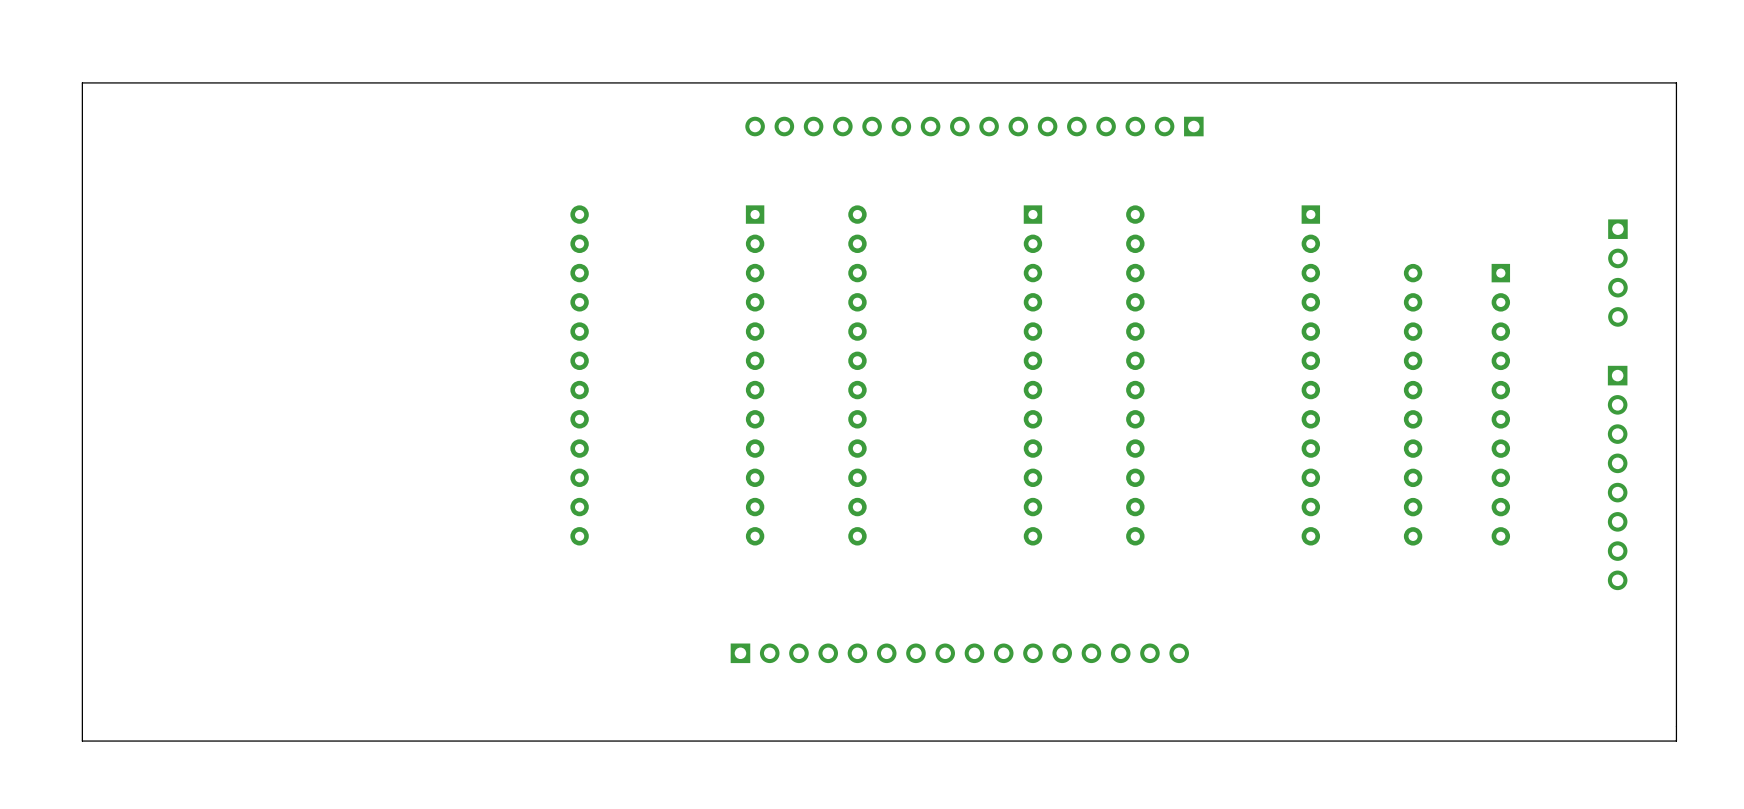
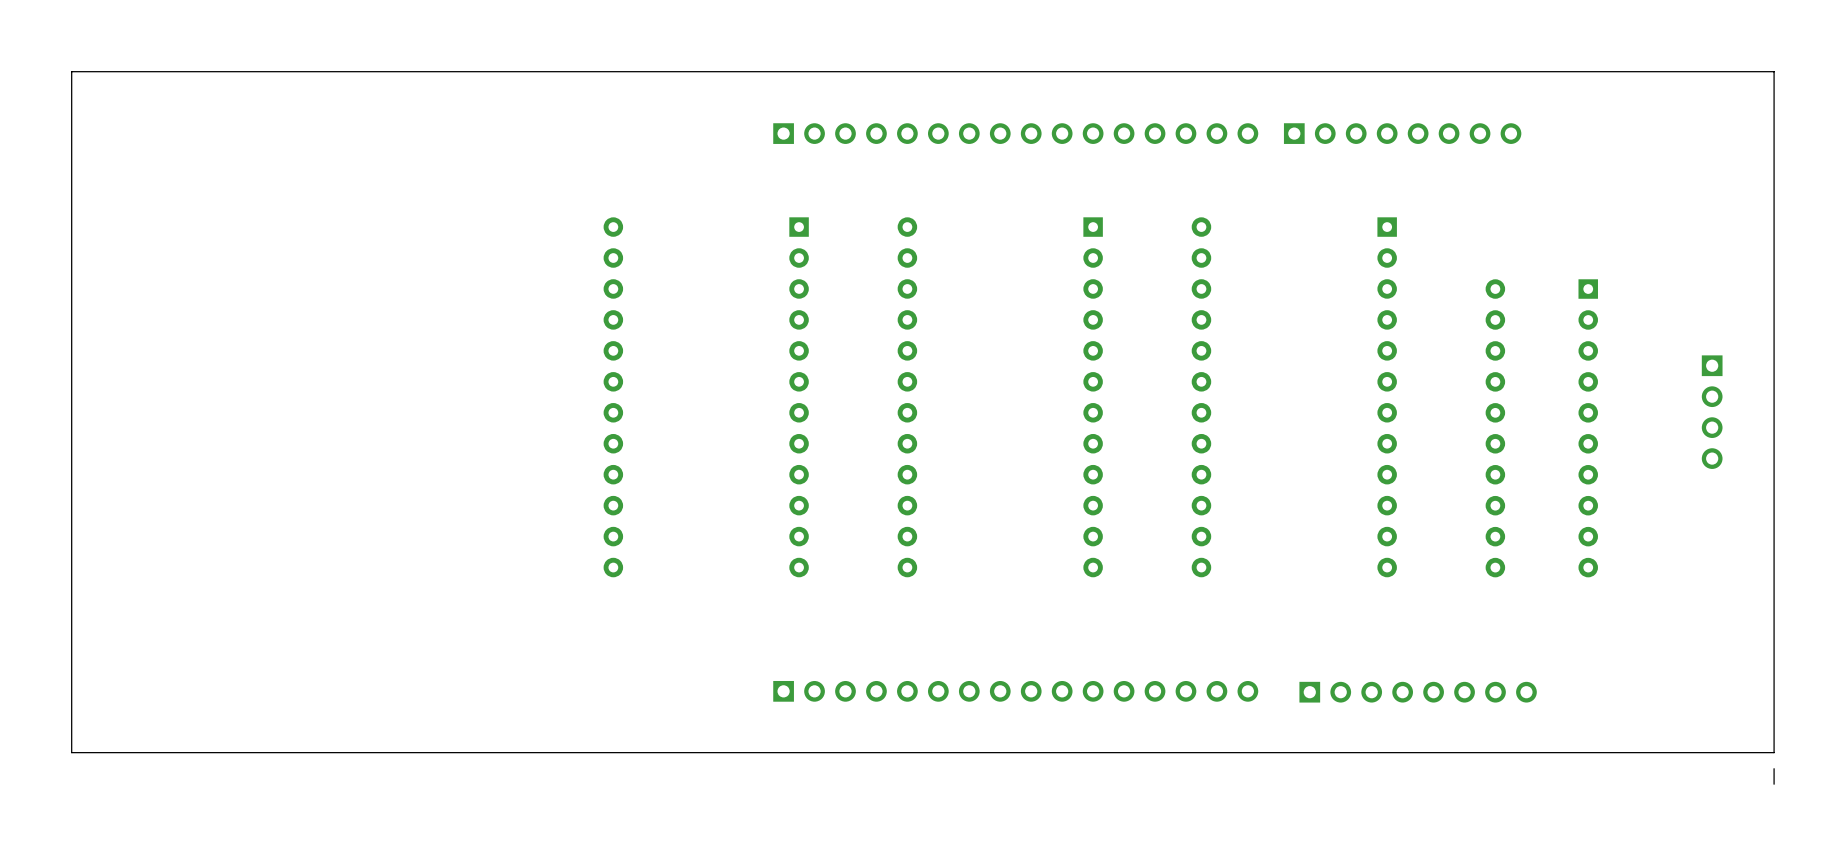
board edge: (1676, 82) (82, 82) (82, 741) (1676, 741) -> (1774, 87) (1774, 71) (71, 71) (71, 752) (1774, 752)
part rotation: 0° (974, 126) -> 180° (1015, 133)
part: none -> (1402, 133)
part position: (1617, 273) -> (1712, 412)
part: (1617, 477) -> none
part: none -> (1418, 692)
board edge: (1676, 711) (1676, 726) -> none

